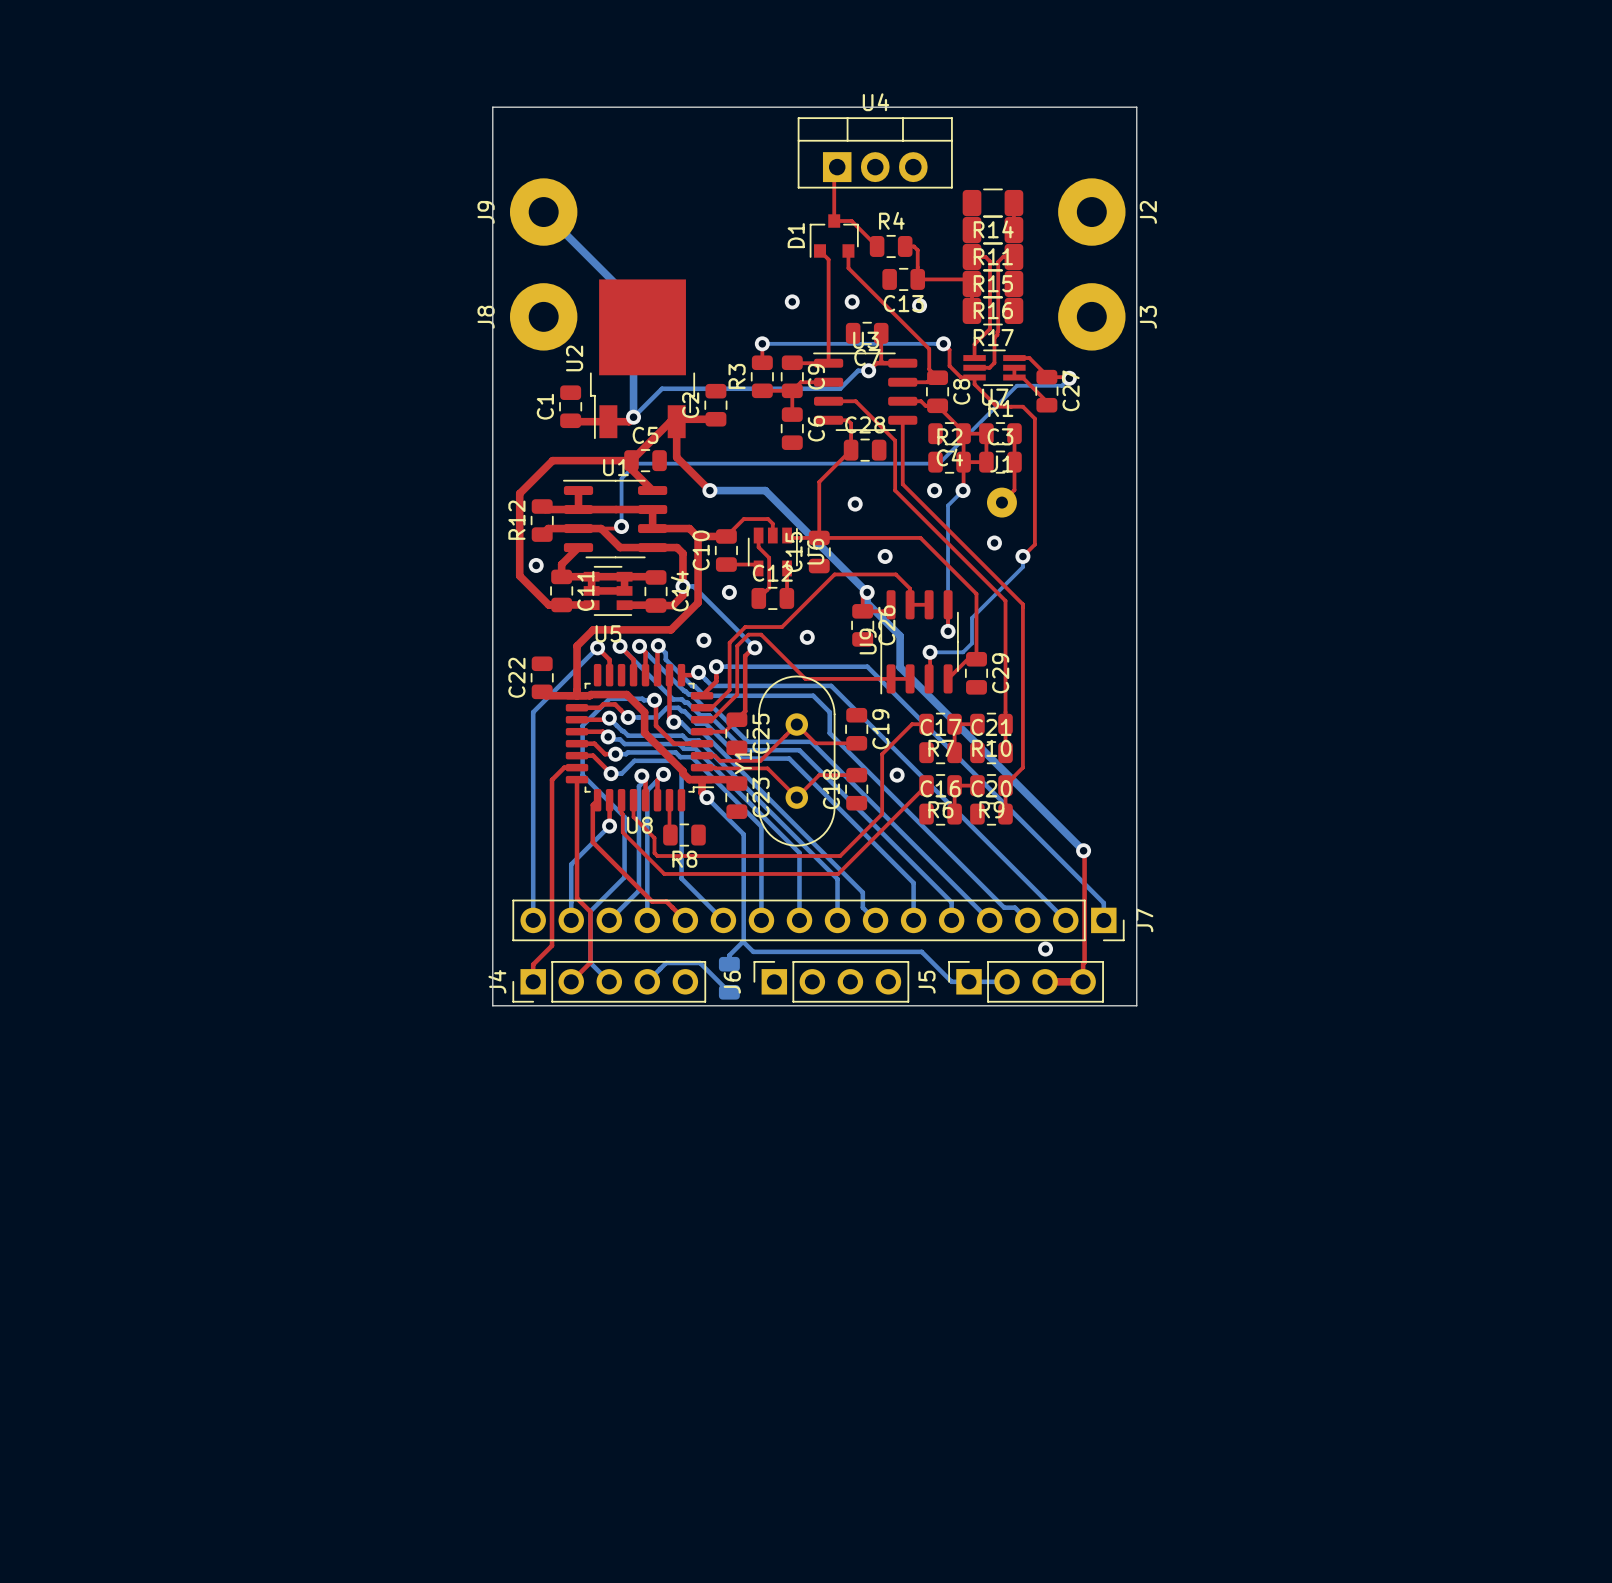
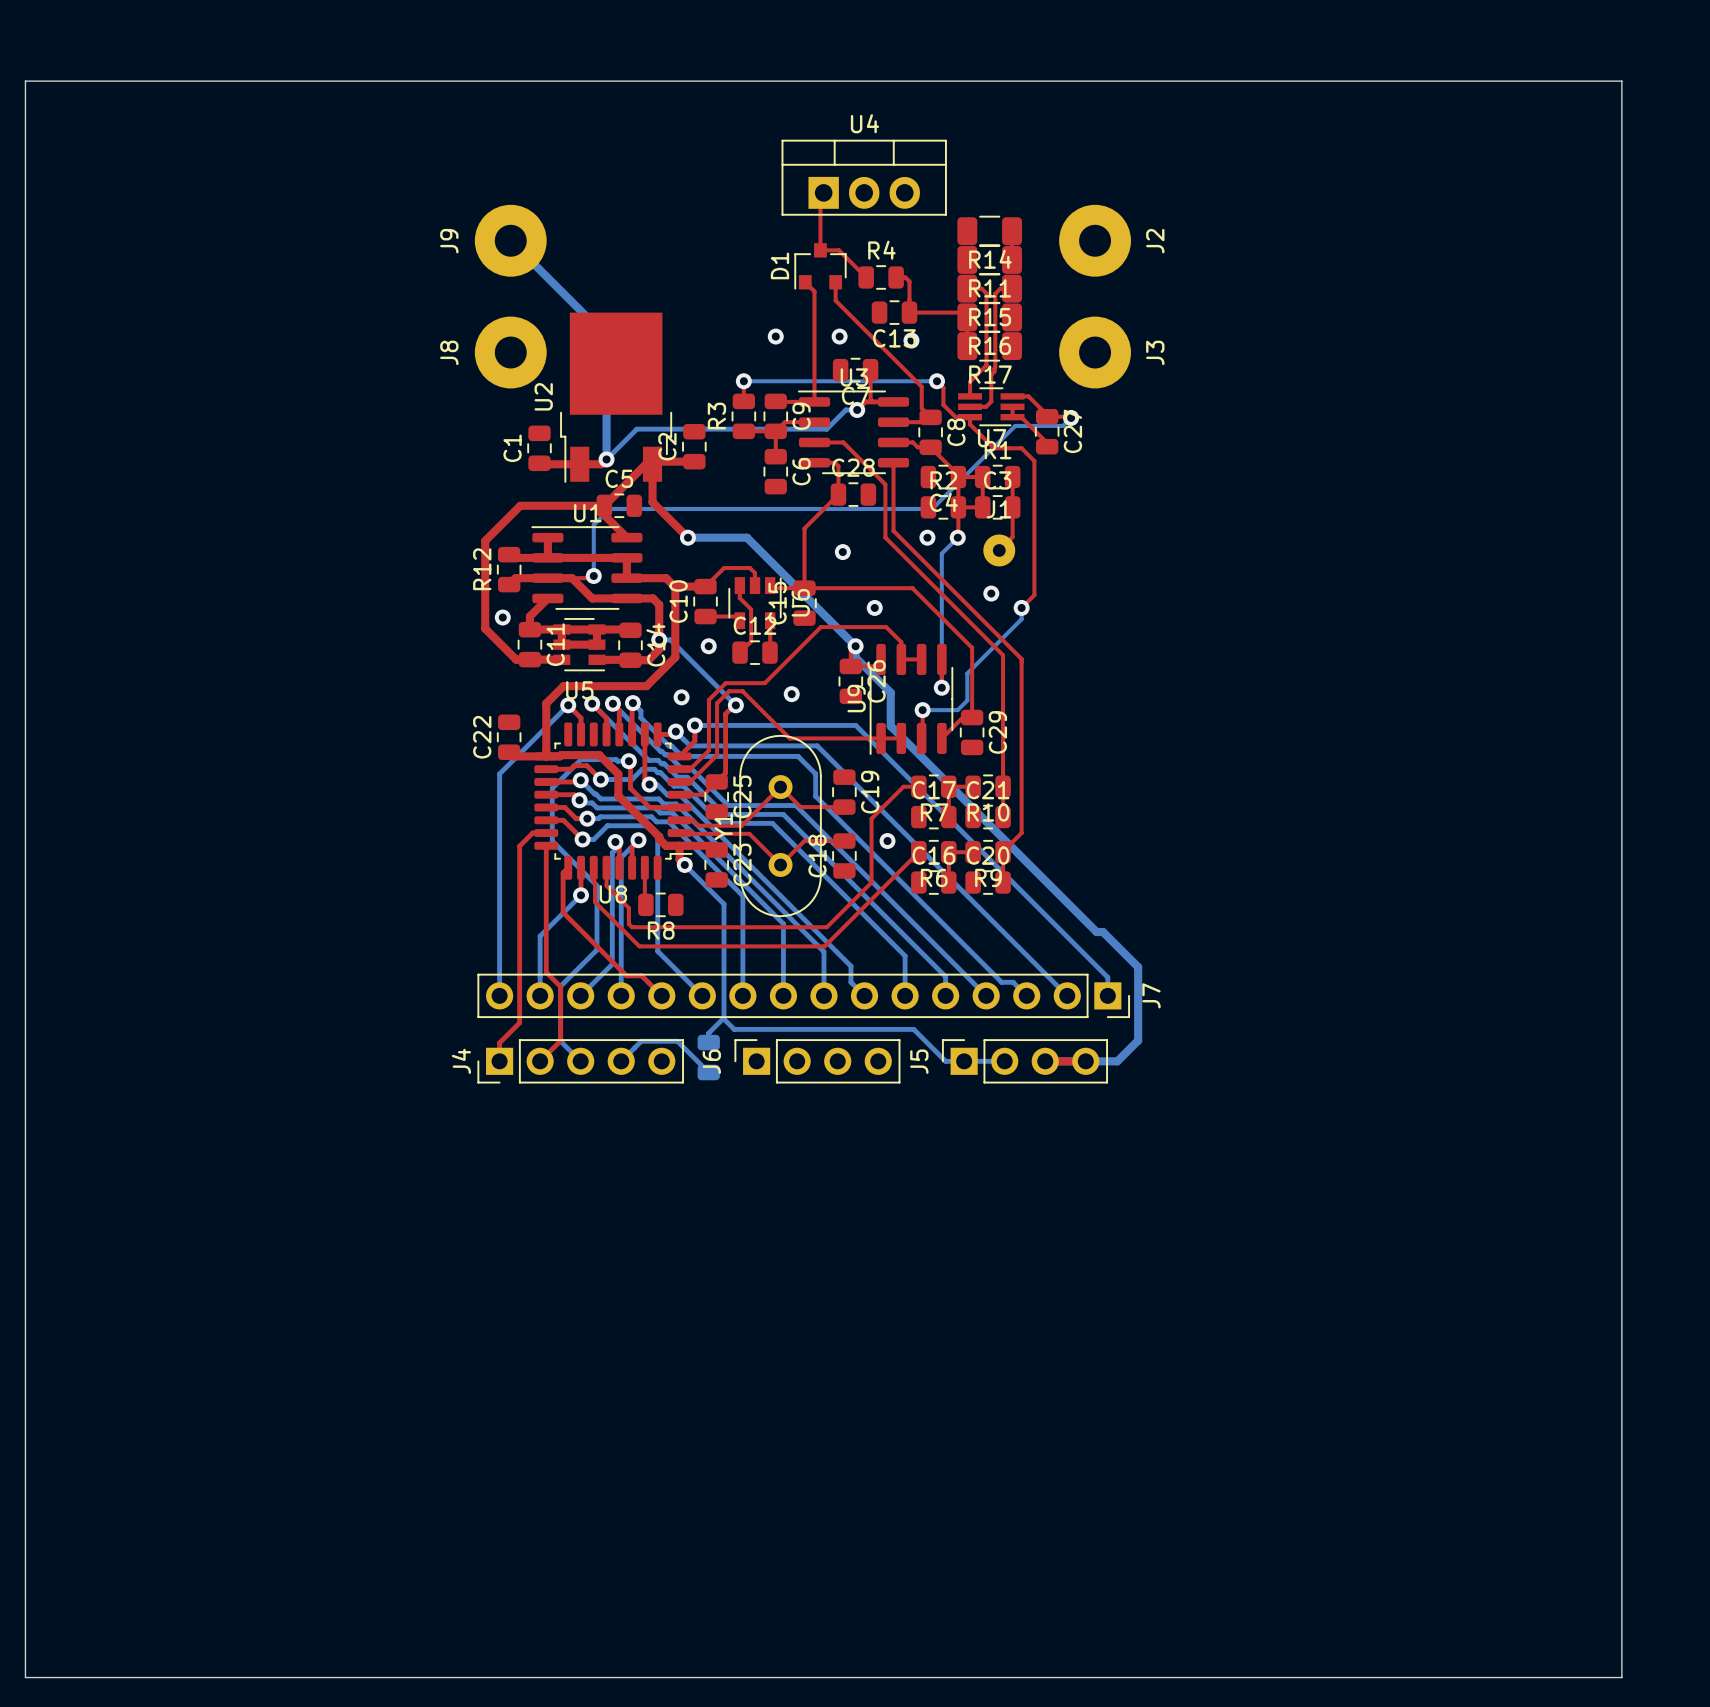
board edge: none -> (25, 81) (25, 1677) (1621, 1677) (1621, 81) (25, 81)
board edge: (492, 107) (492, 1005) (1136, 1005) (1136, 107) (492, 107) -> none
top track: (1083, 850) (1083, 981) -> none
bottom track: none -> (1086, 921) (1096, 932) (1103, 932) (1138, 967) (1138, 1040) (1117, 1061) (1045, 1061)
via: (1083, 850) -> none
via: (1045, 949) -> none

